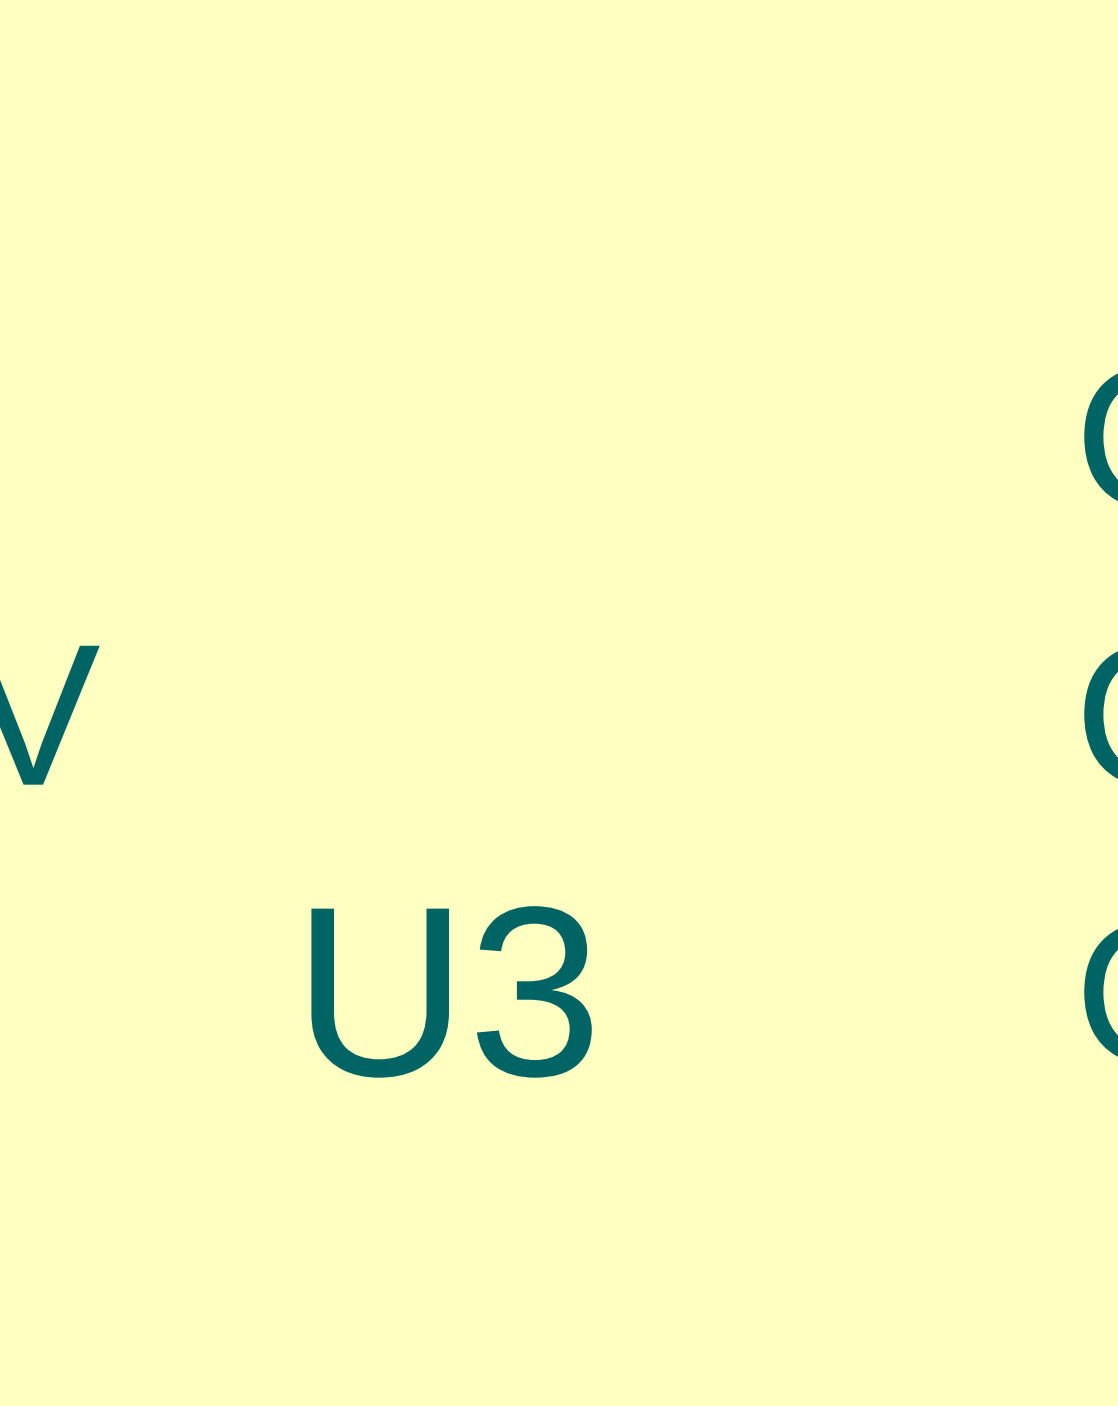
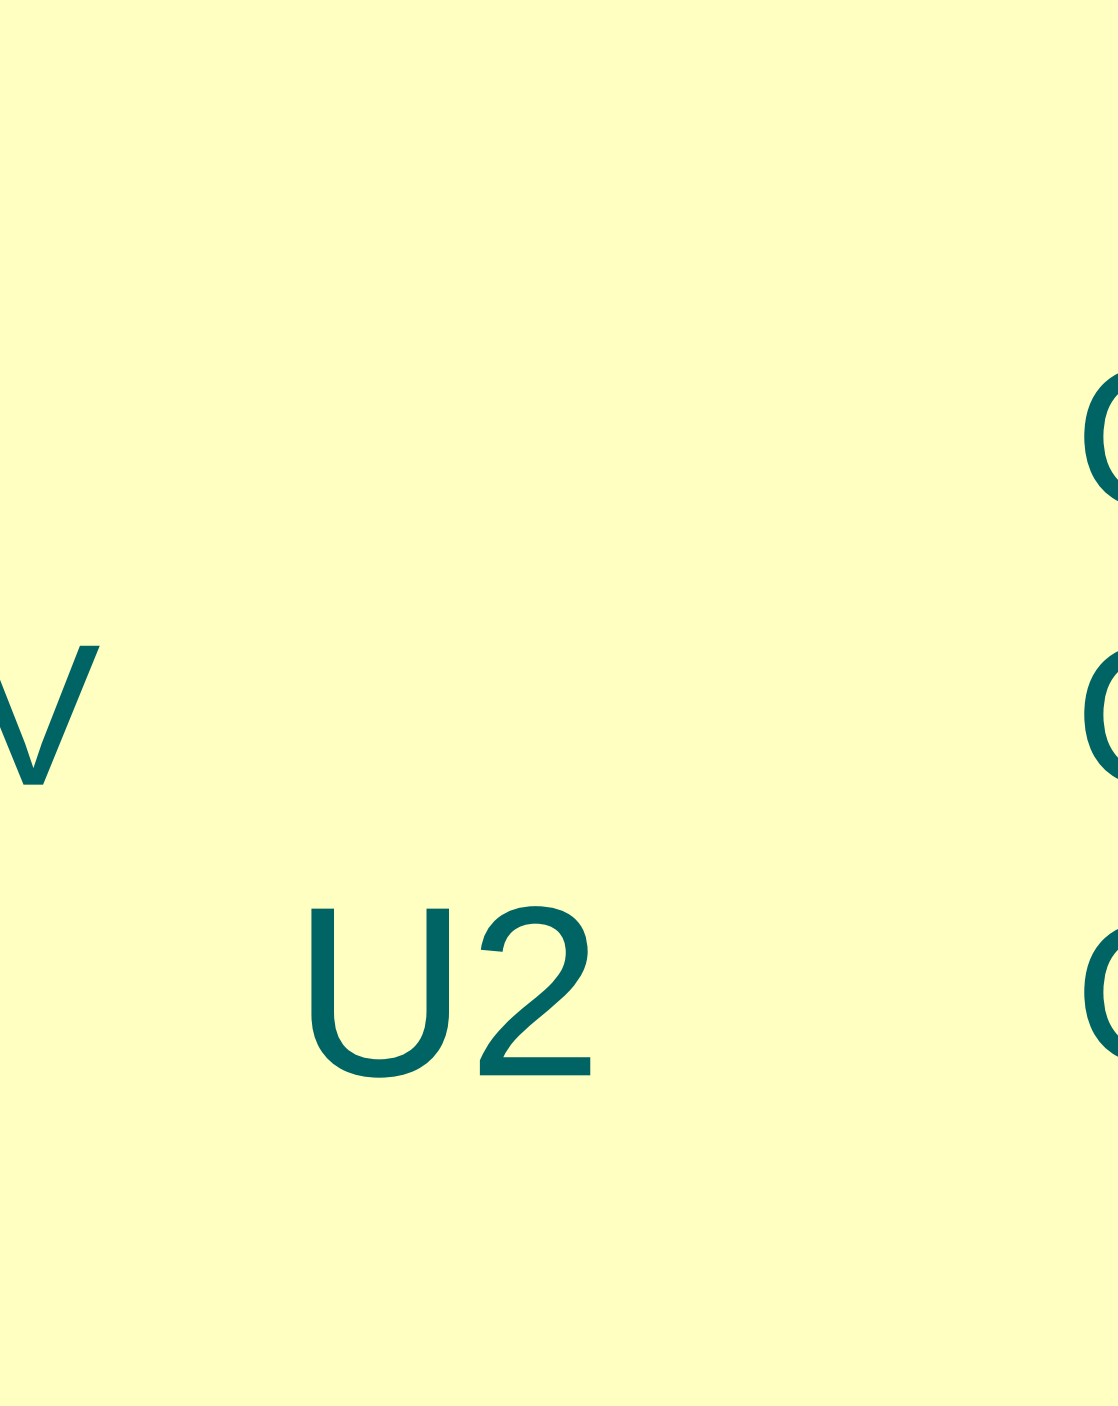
U3 name: U3 (451, 991) -> U2 (450, 991)

